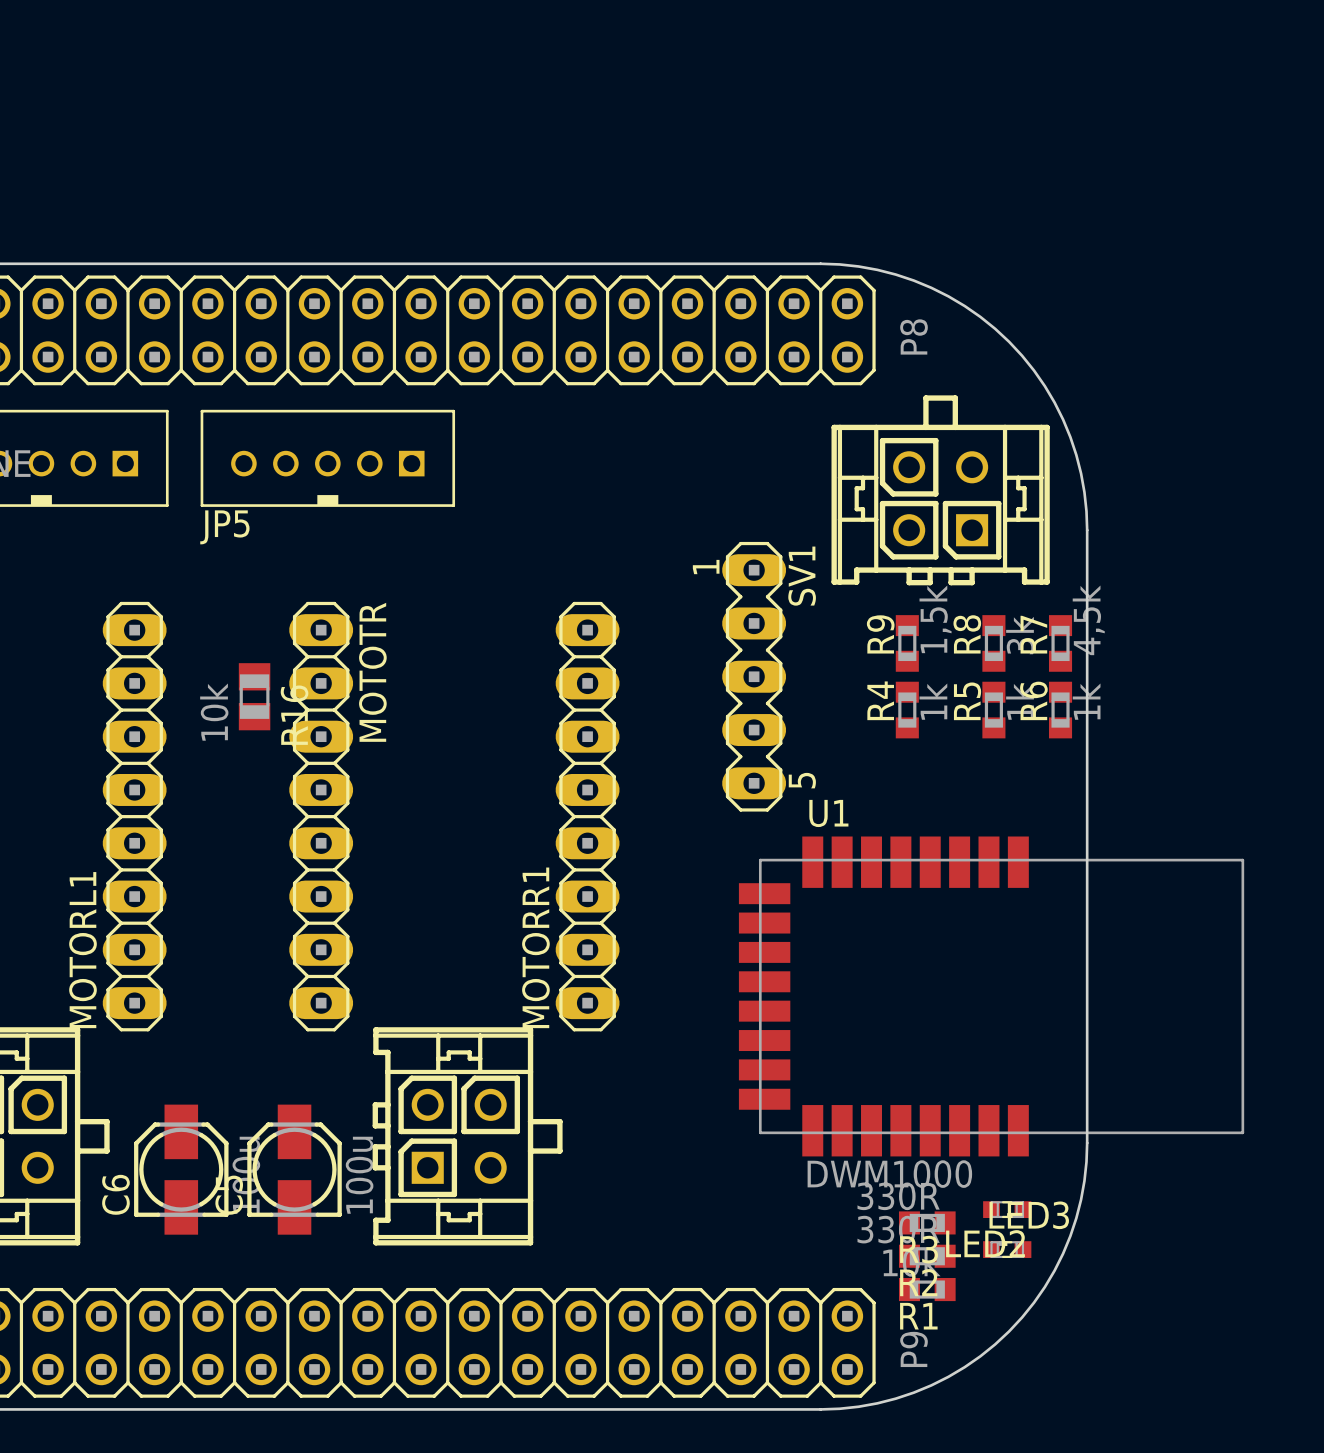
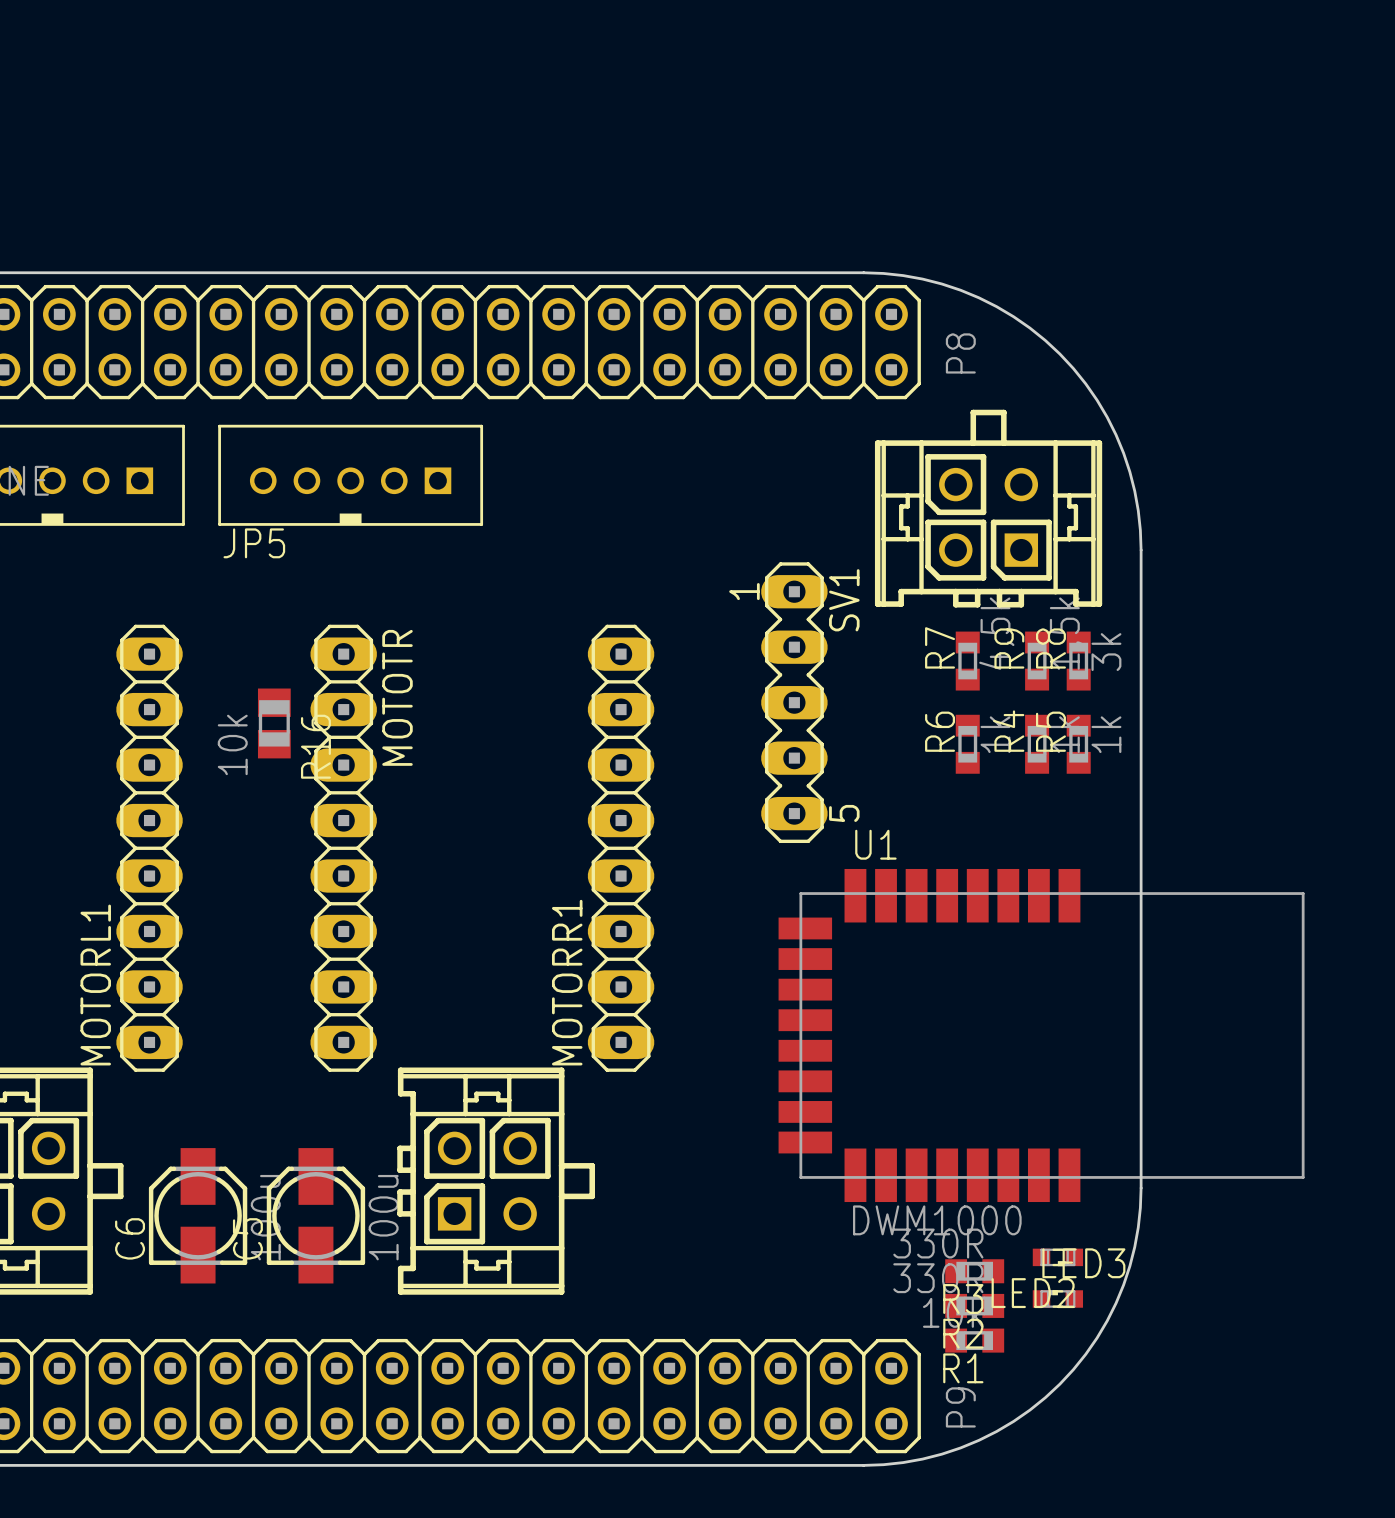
R9 position: (907, 643) -> (1037, 661)
R8 position: (993, 643) -> (1078, 661)
R7 position: (1060, 643) -> (967, 661)
R4 position: (907, 710) -> (1037, 744)
R5 position: (993, 710) -> (1078, 744)
R6 position: (1060, 710) -> (967, 744)

